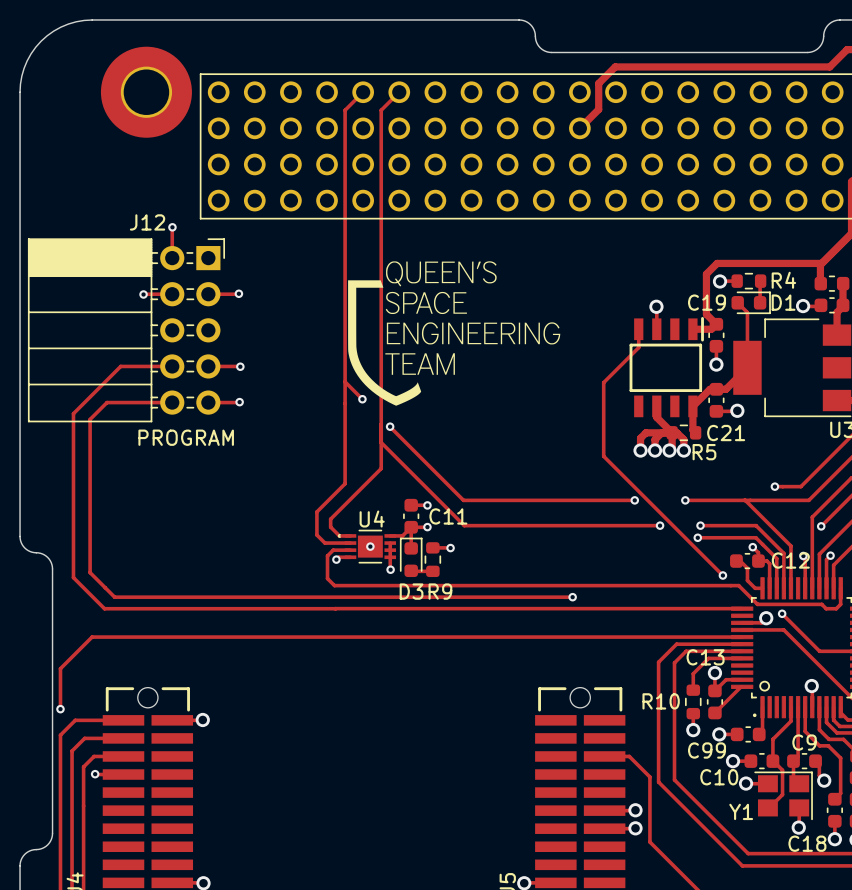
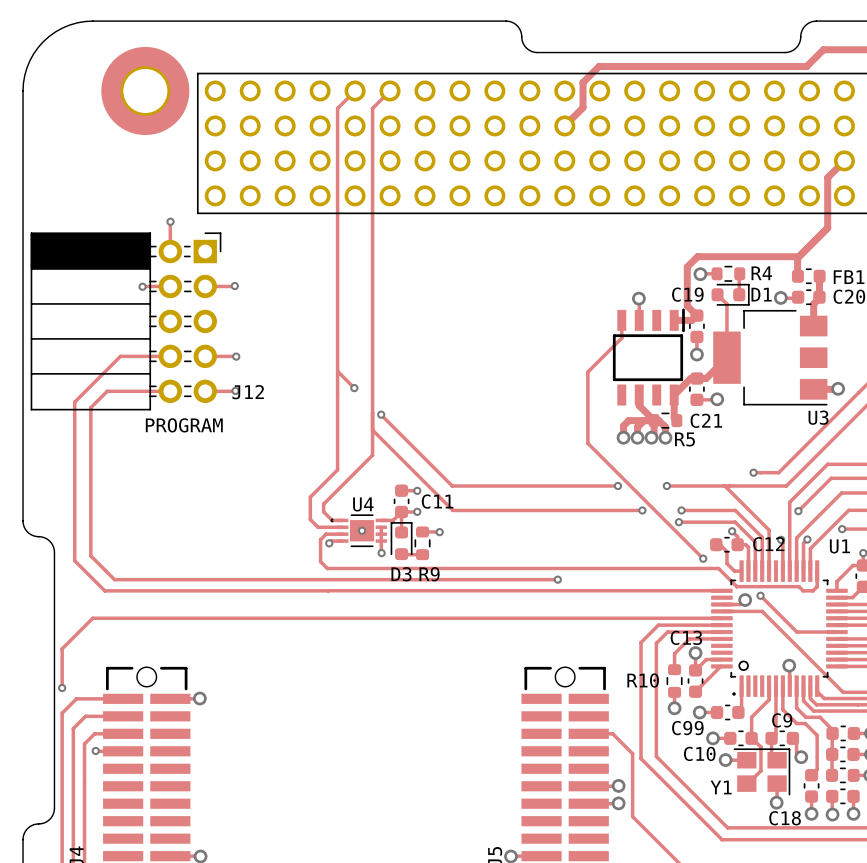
J12 name position: J12 (147, 222) -> J12 (248, 392)
drawing: [348, 261, 561, 406] -> none

